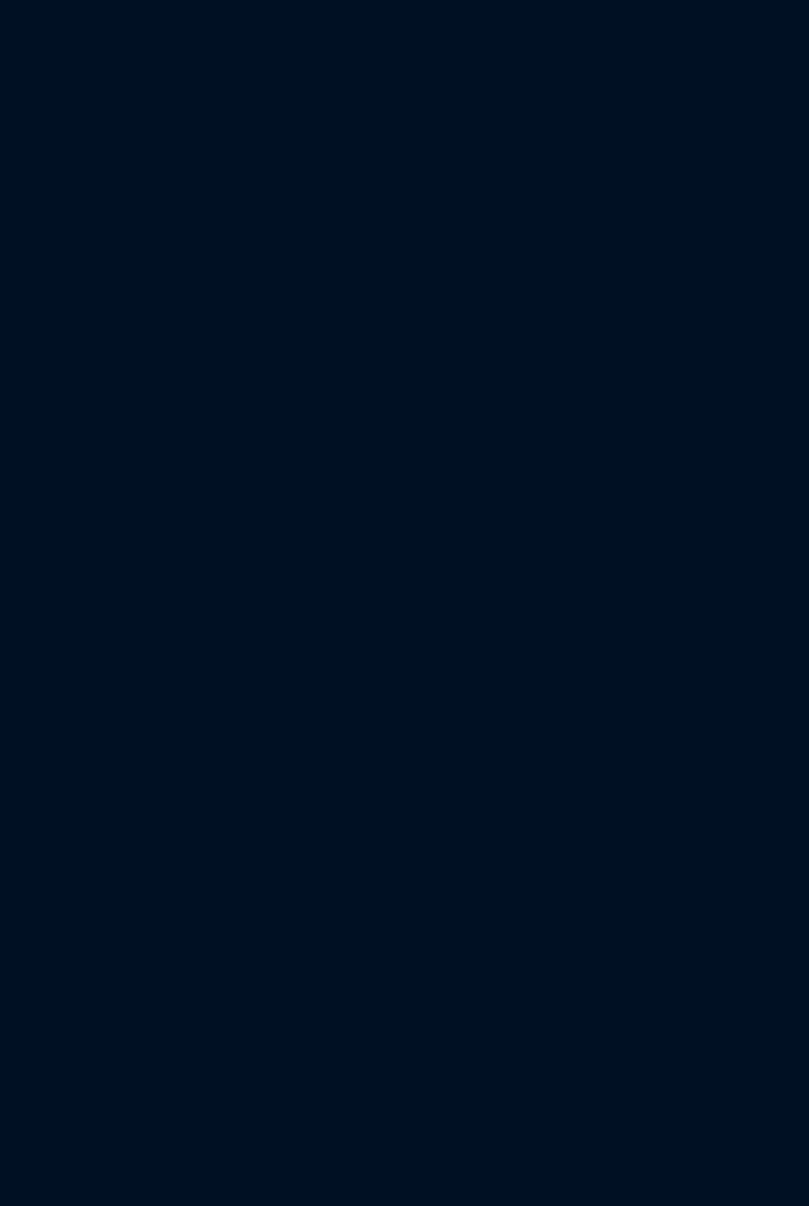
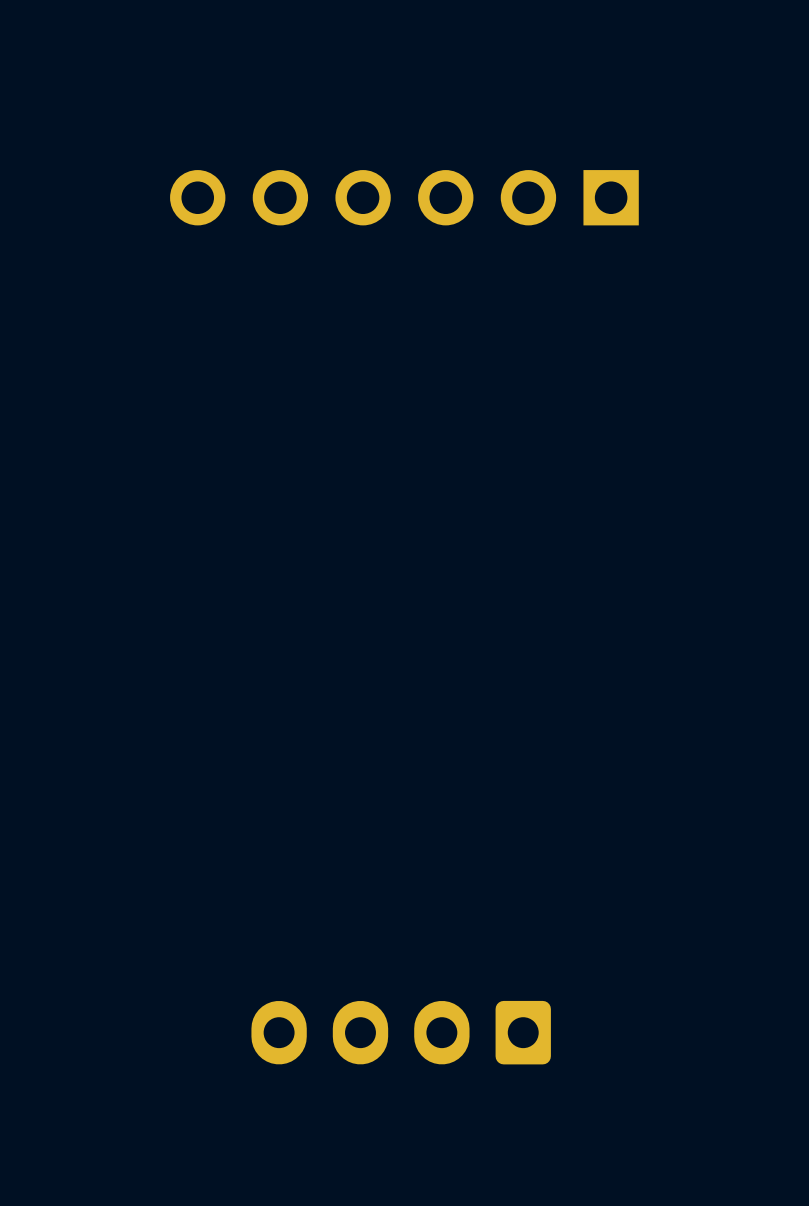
part: none -> (404, 197)
part: none -> (401, 1032)

